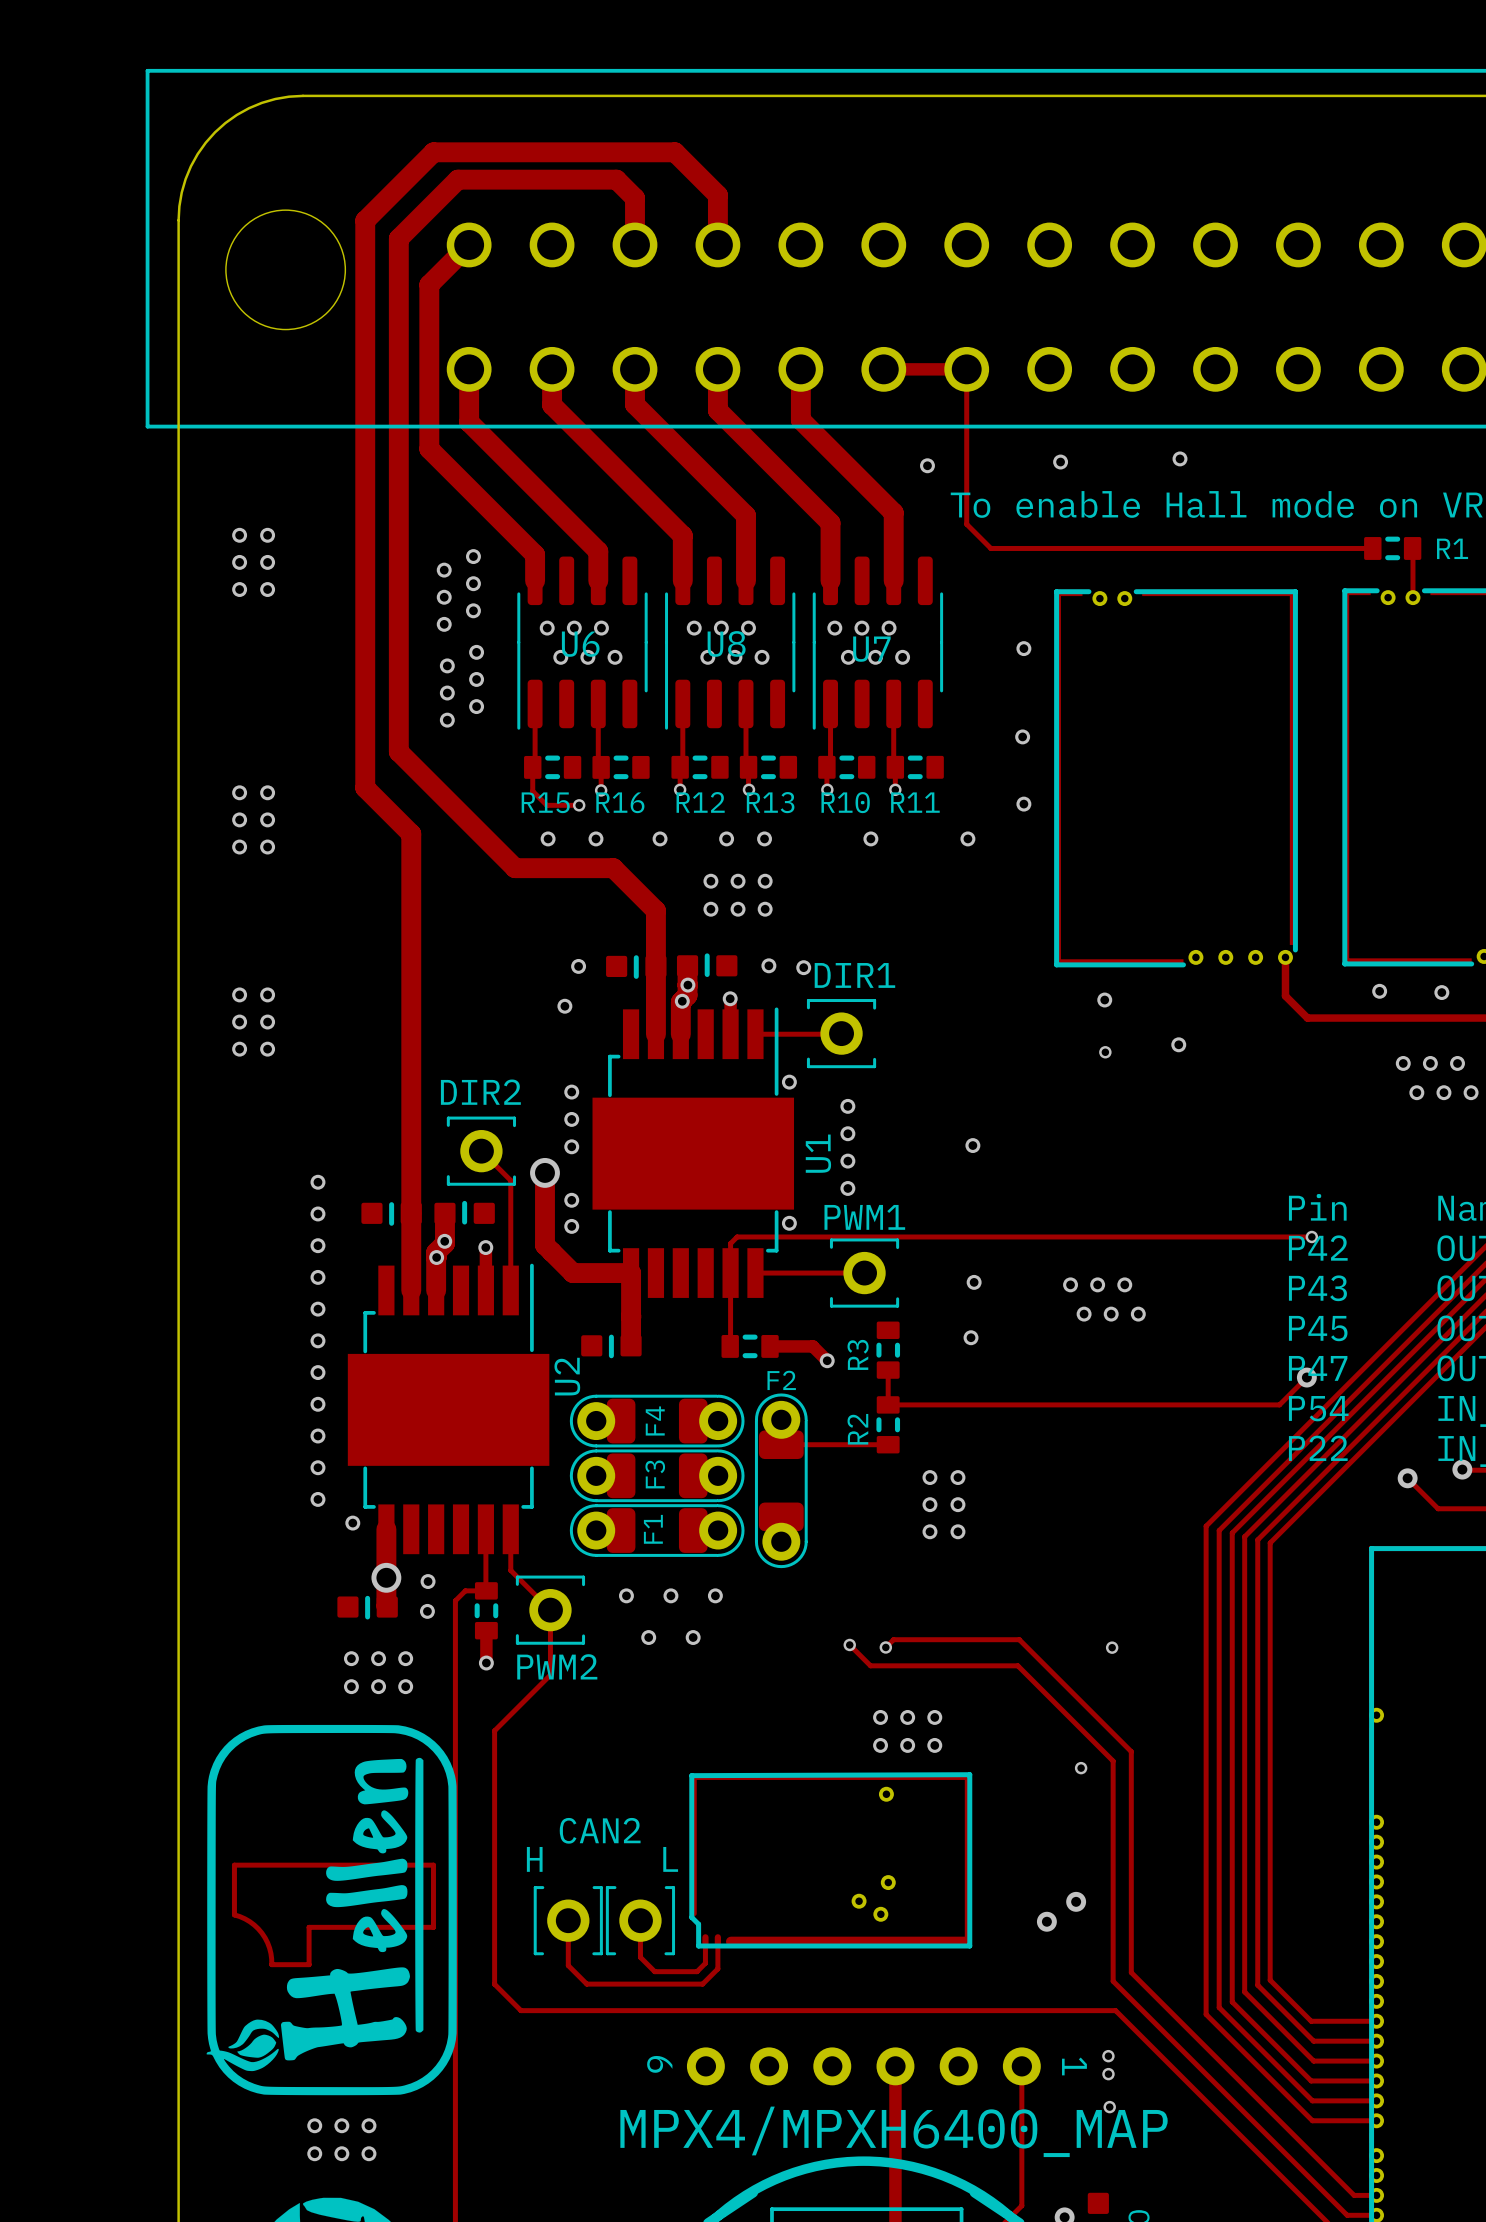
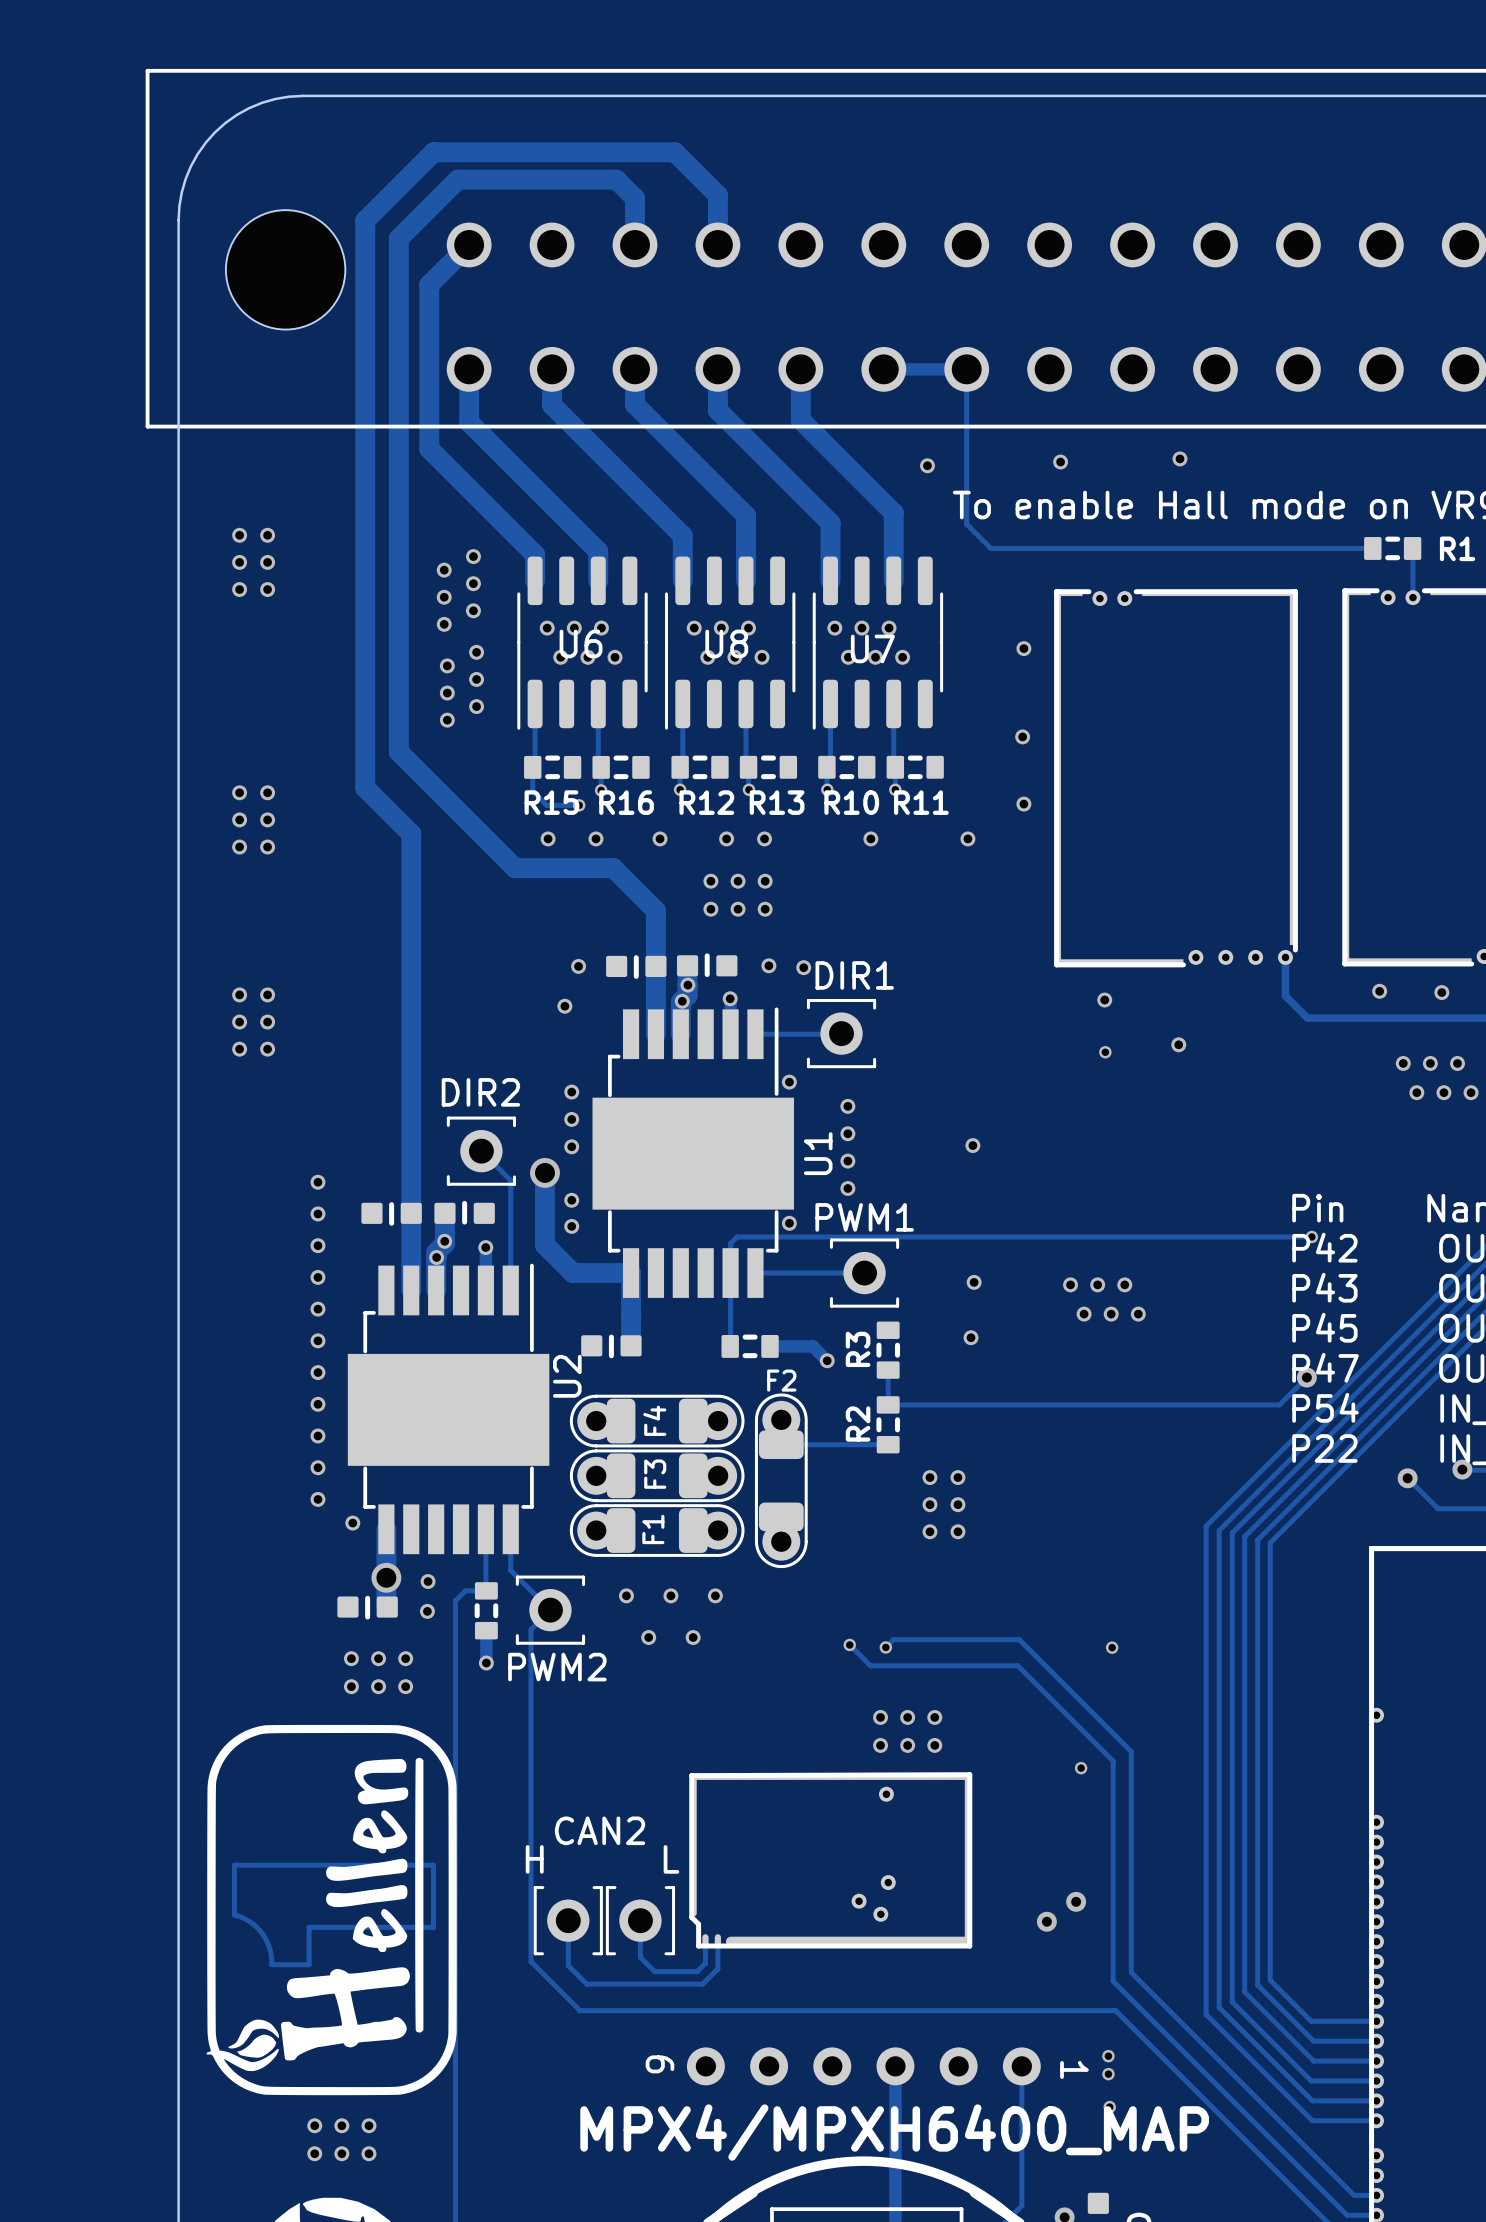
track: (550, 1610) (550, 1674) (494, 1730) (494, 1984) (520, 2010) (580, 2010) -> (550, 1610) (531, 1629) (531, 1961) (580, 2010)

